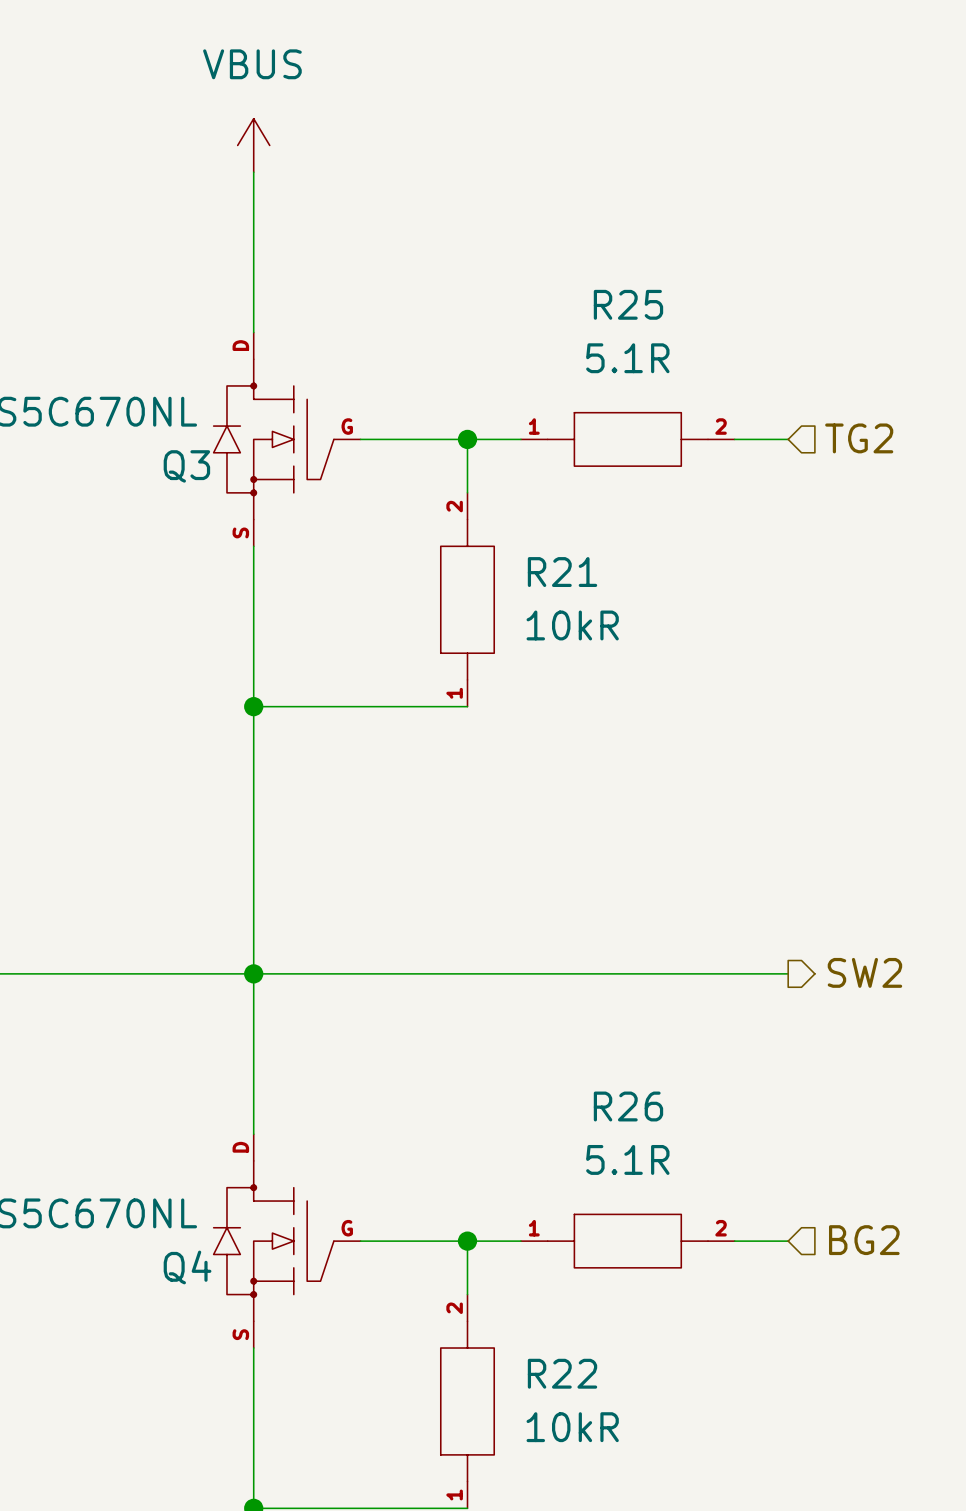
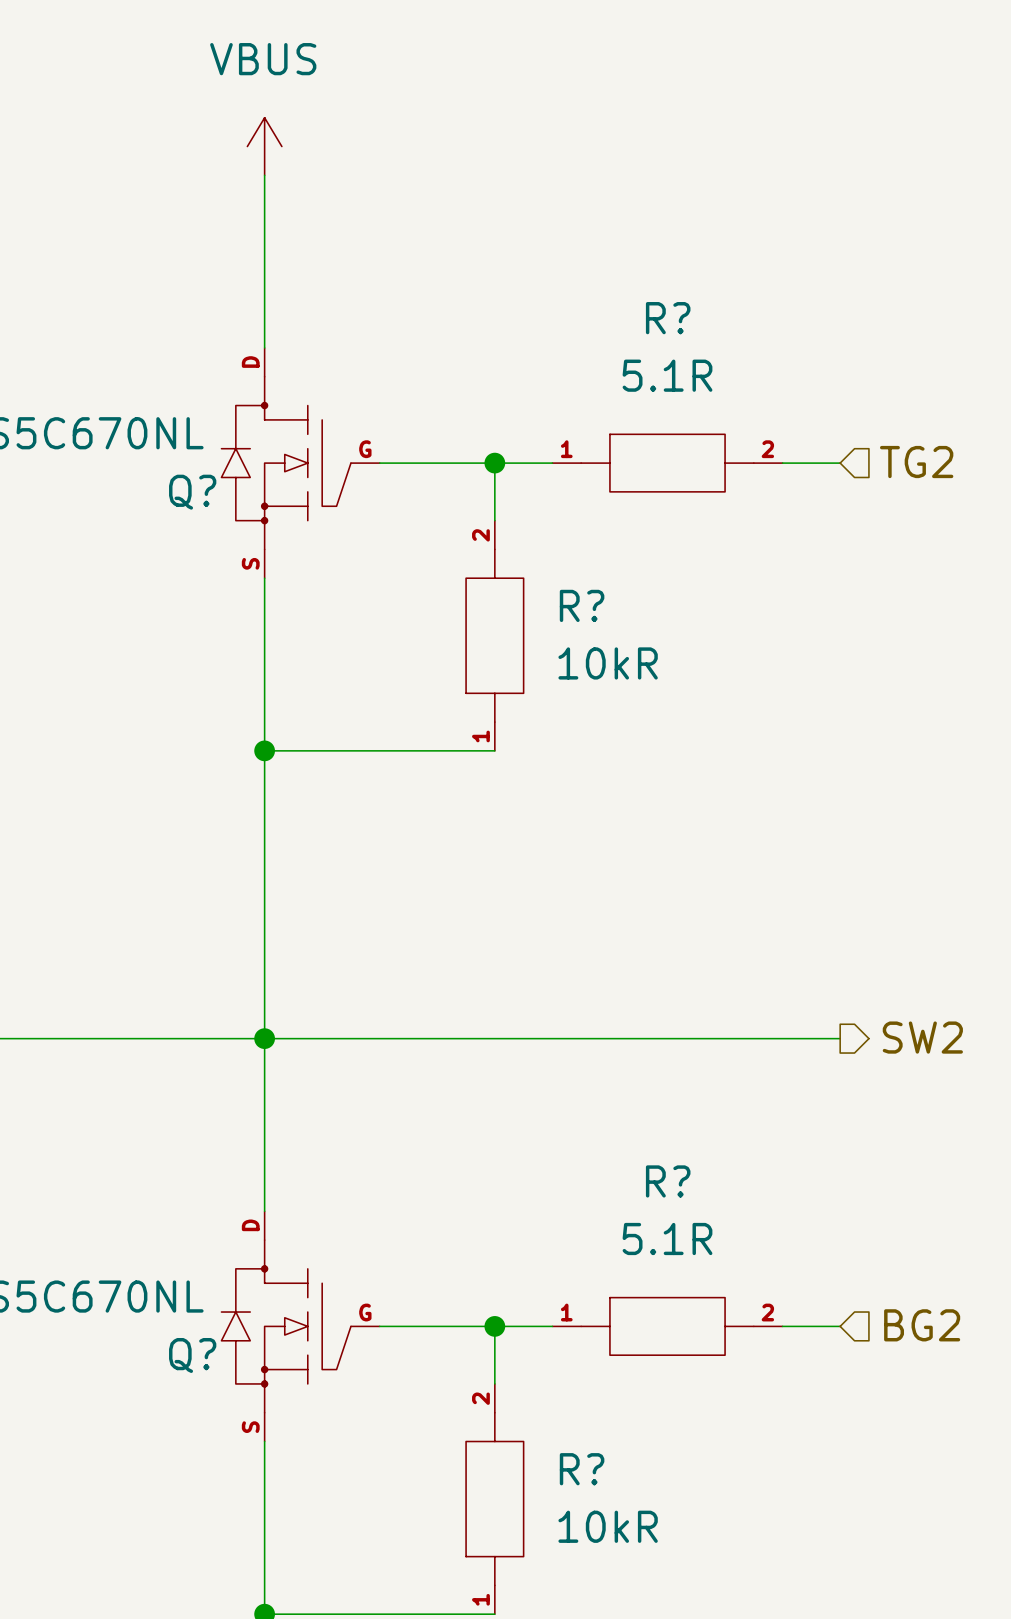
R25 name: R25 (628, 304) -> R? (668, 318)
Q3 name: Q3 (186, 466) -> Q? (192, 492)
R21 name: R21 (562, 572) -> R? (582, 605)
R26 name: R26 (628, 1106) -> R? (668, 1181)
Q4 name: Q4 (187, 1267) -> Q? (192, 1355)
R22 name: R22 (562, 1373) -> R? (582, 1469)

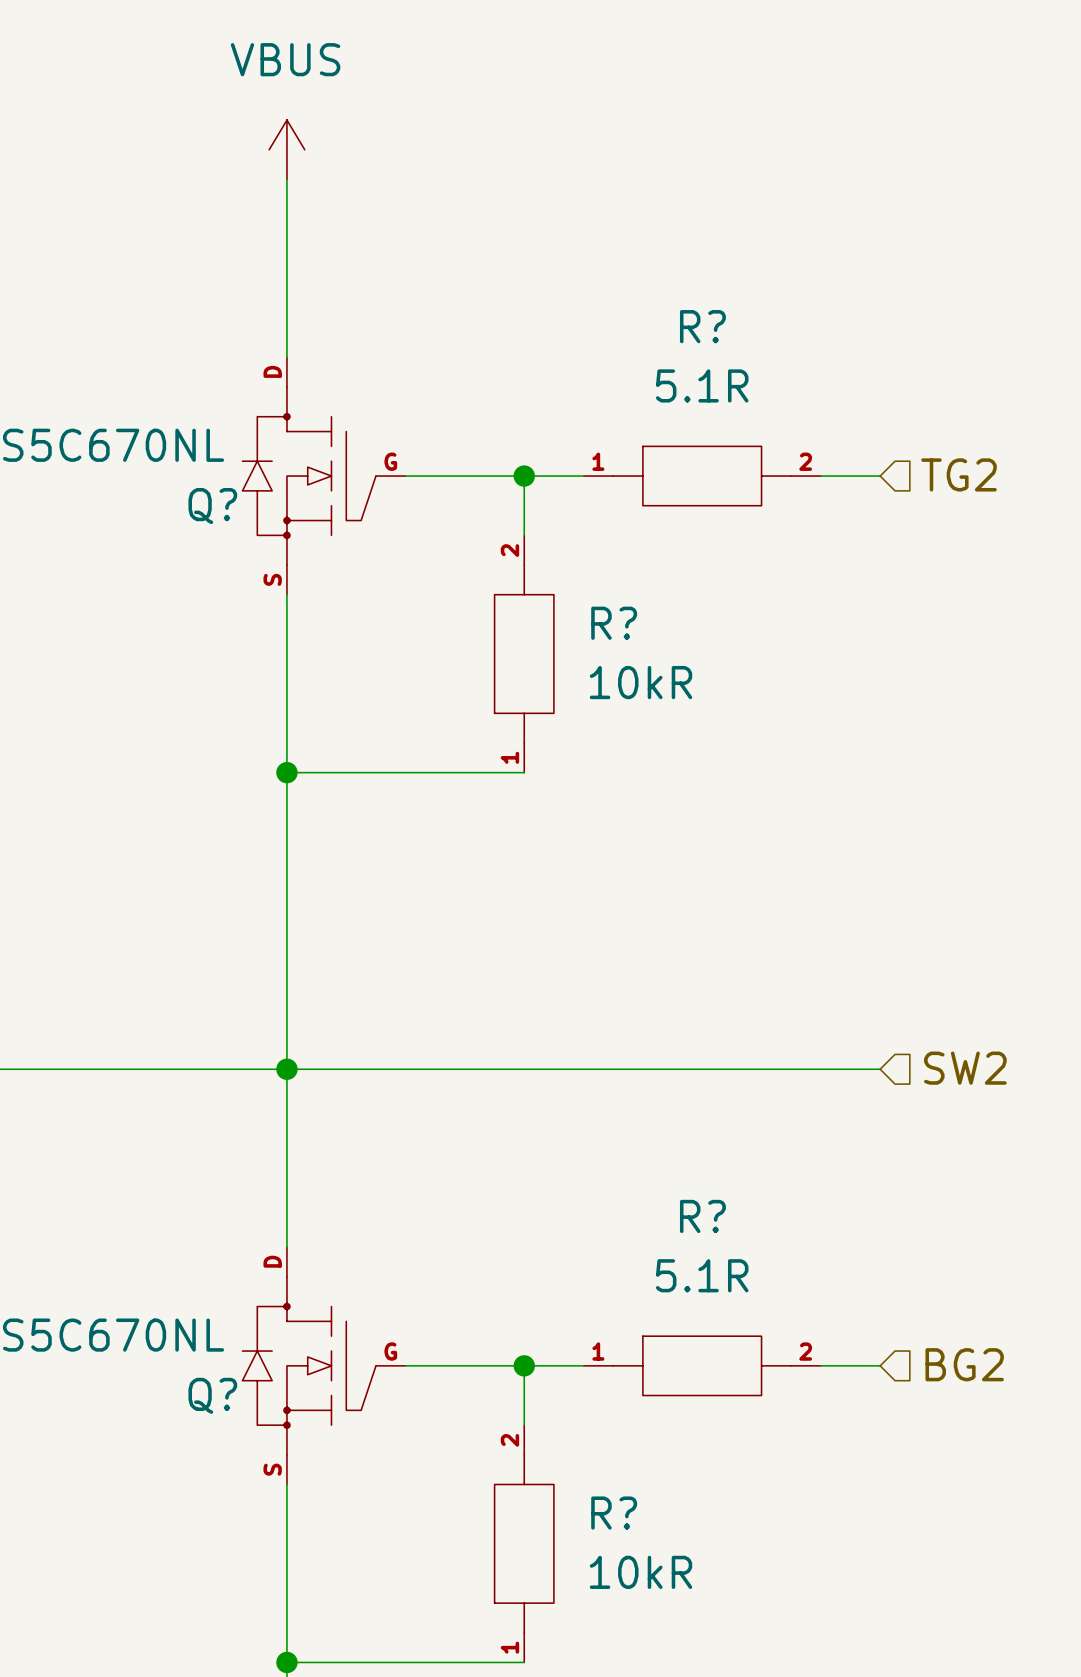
hierarchical label shape: output (922, 1037) -> input (965, 1068)

